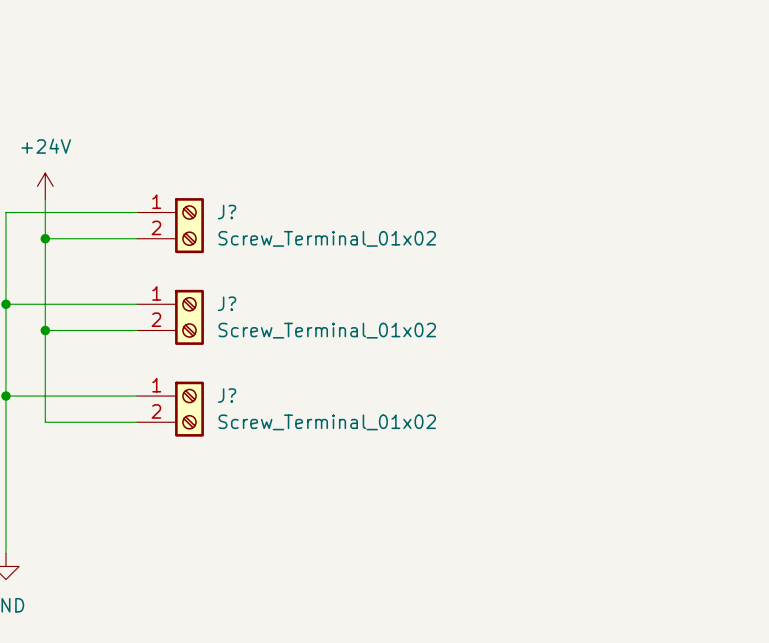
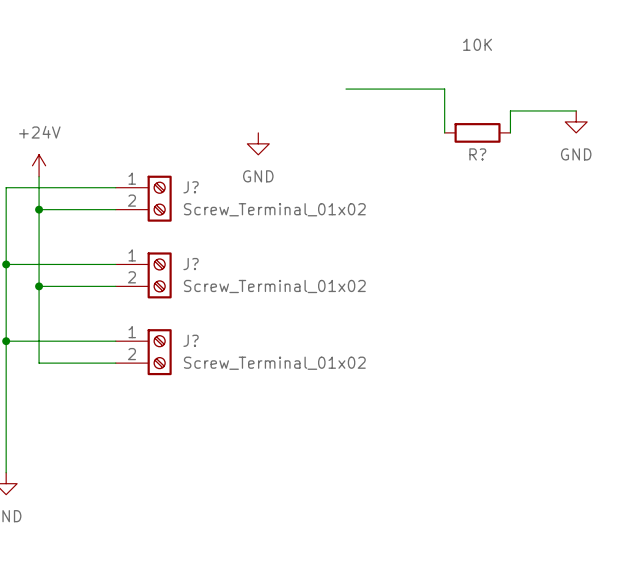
wire: none -> (346, 89) (444, 89) (444, 132)
wire: none -> (576, 110) (510, 110) (510, 132)
power symbol: none -> GND (576, 121)
R?: none -> 10K (477, 132)
power symbol: none -> GND (258, 143)

